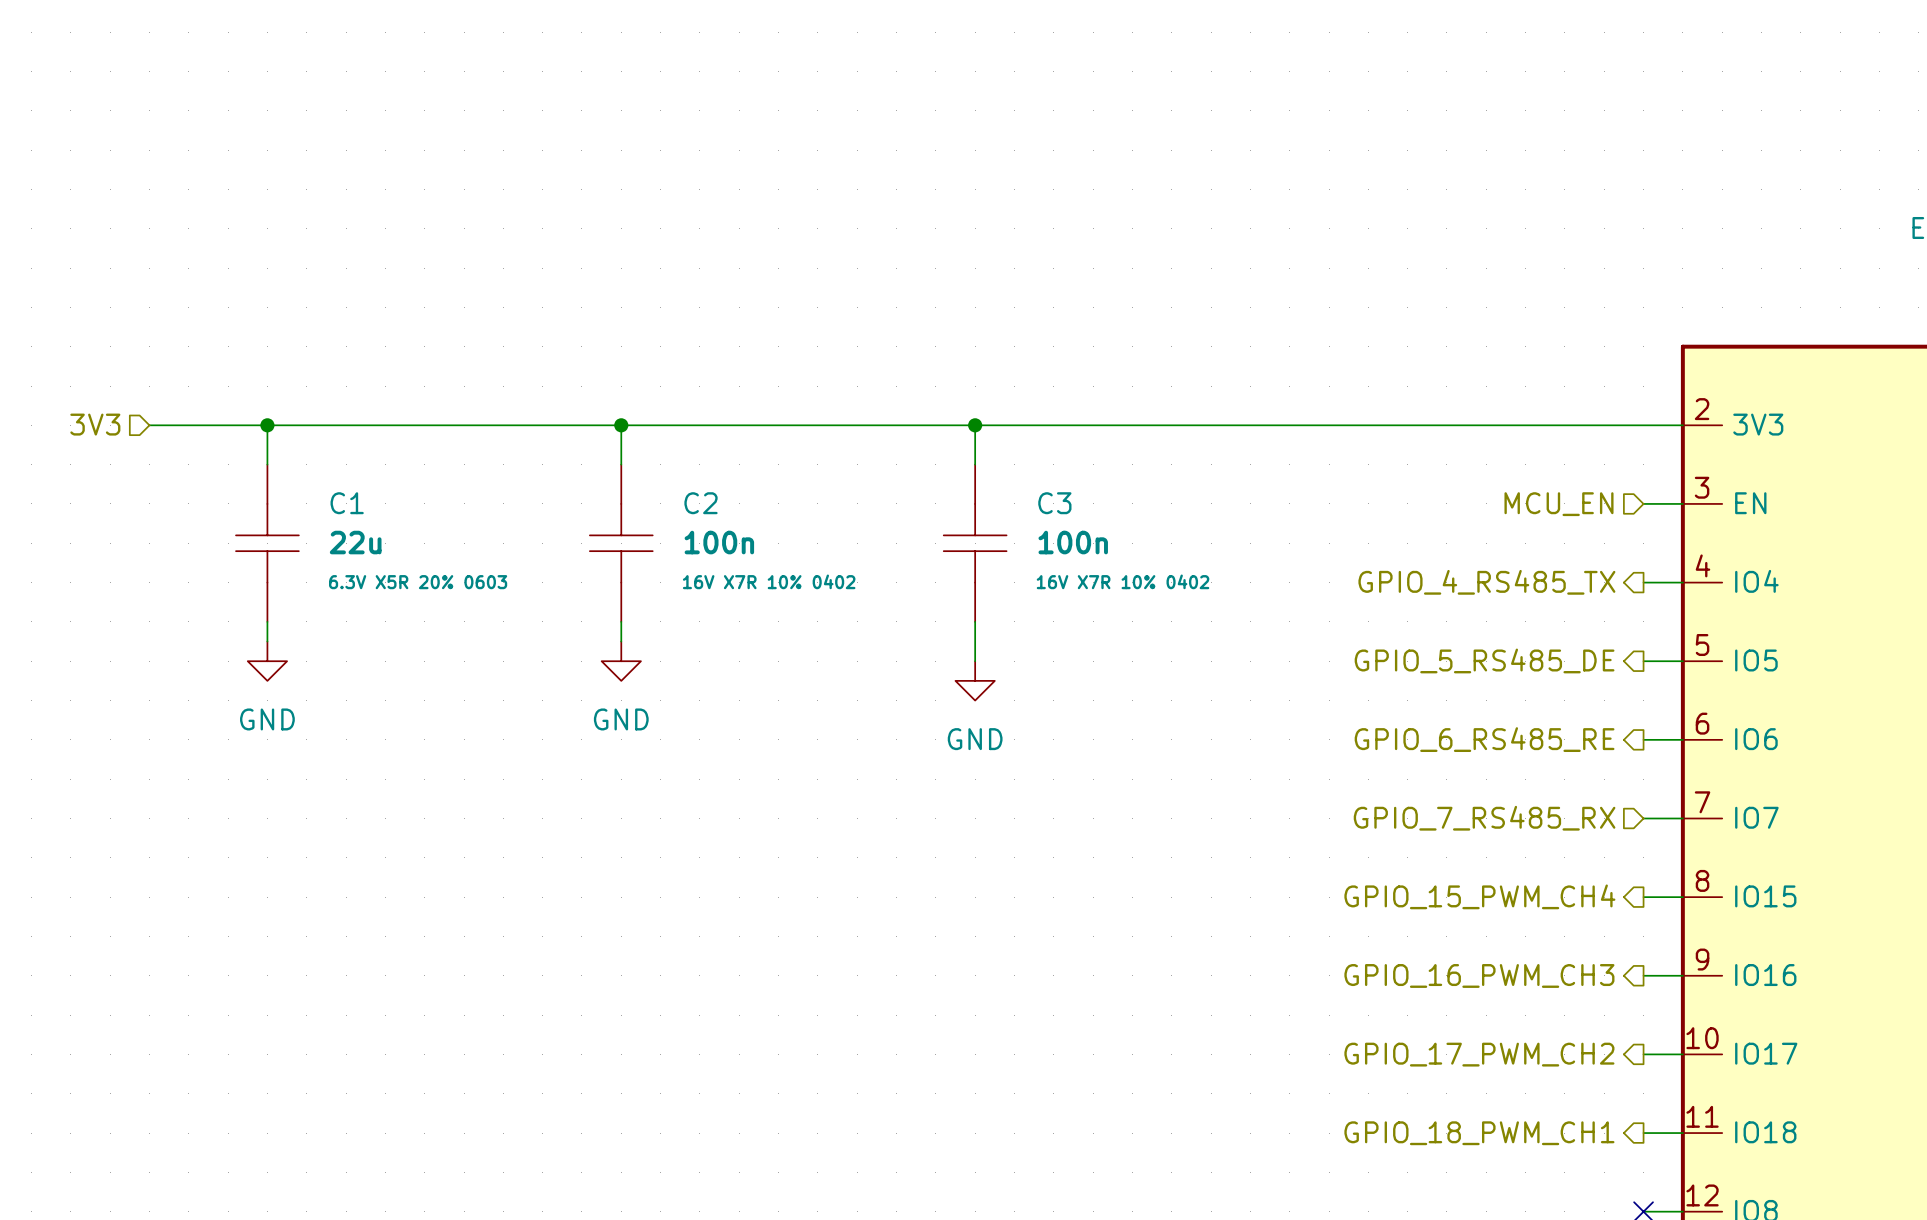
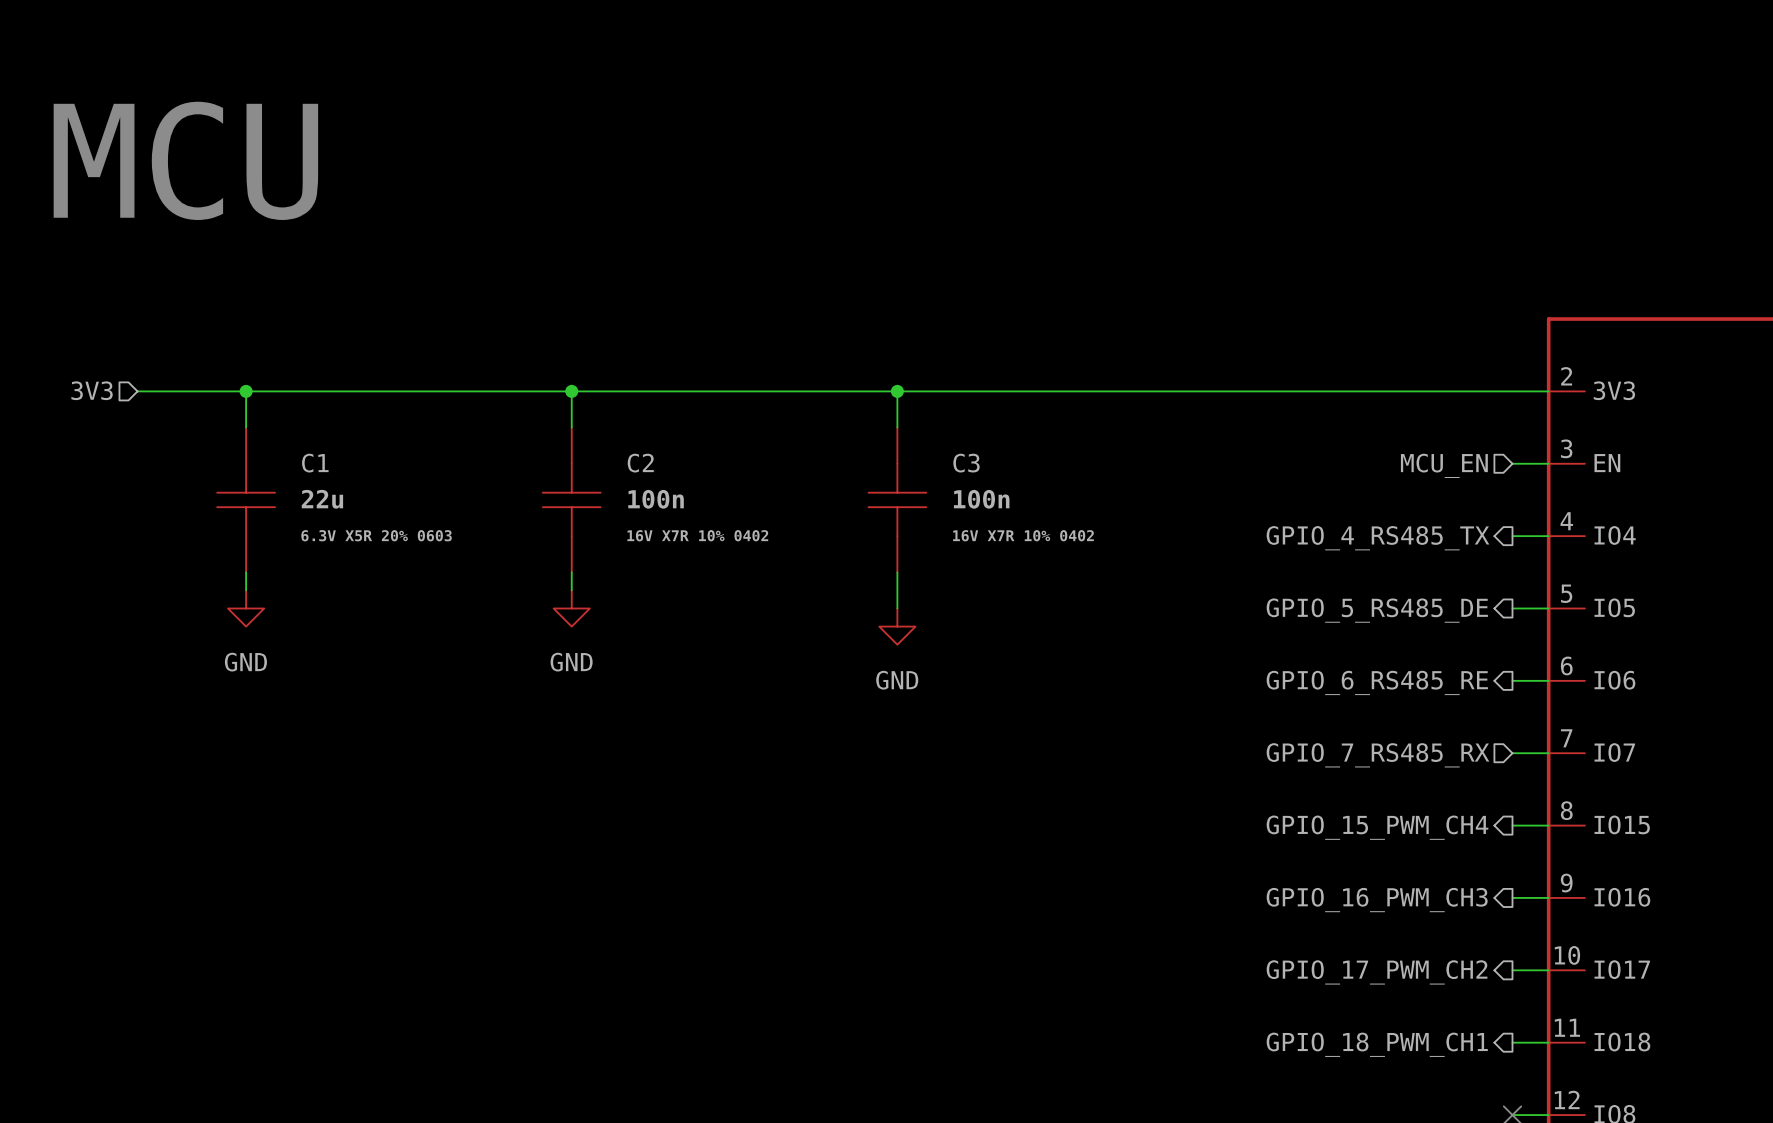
text: none -> MCU (185, 160)

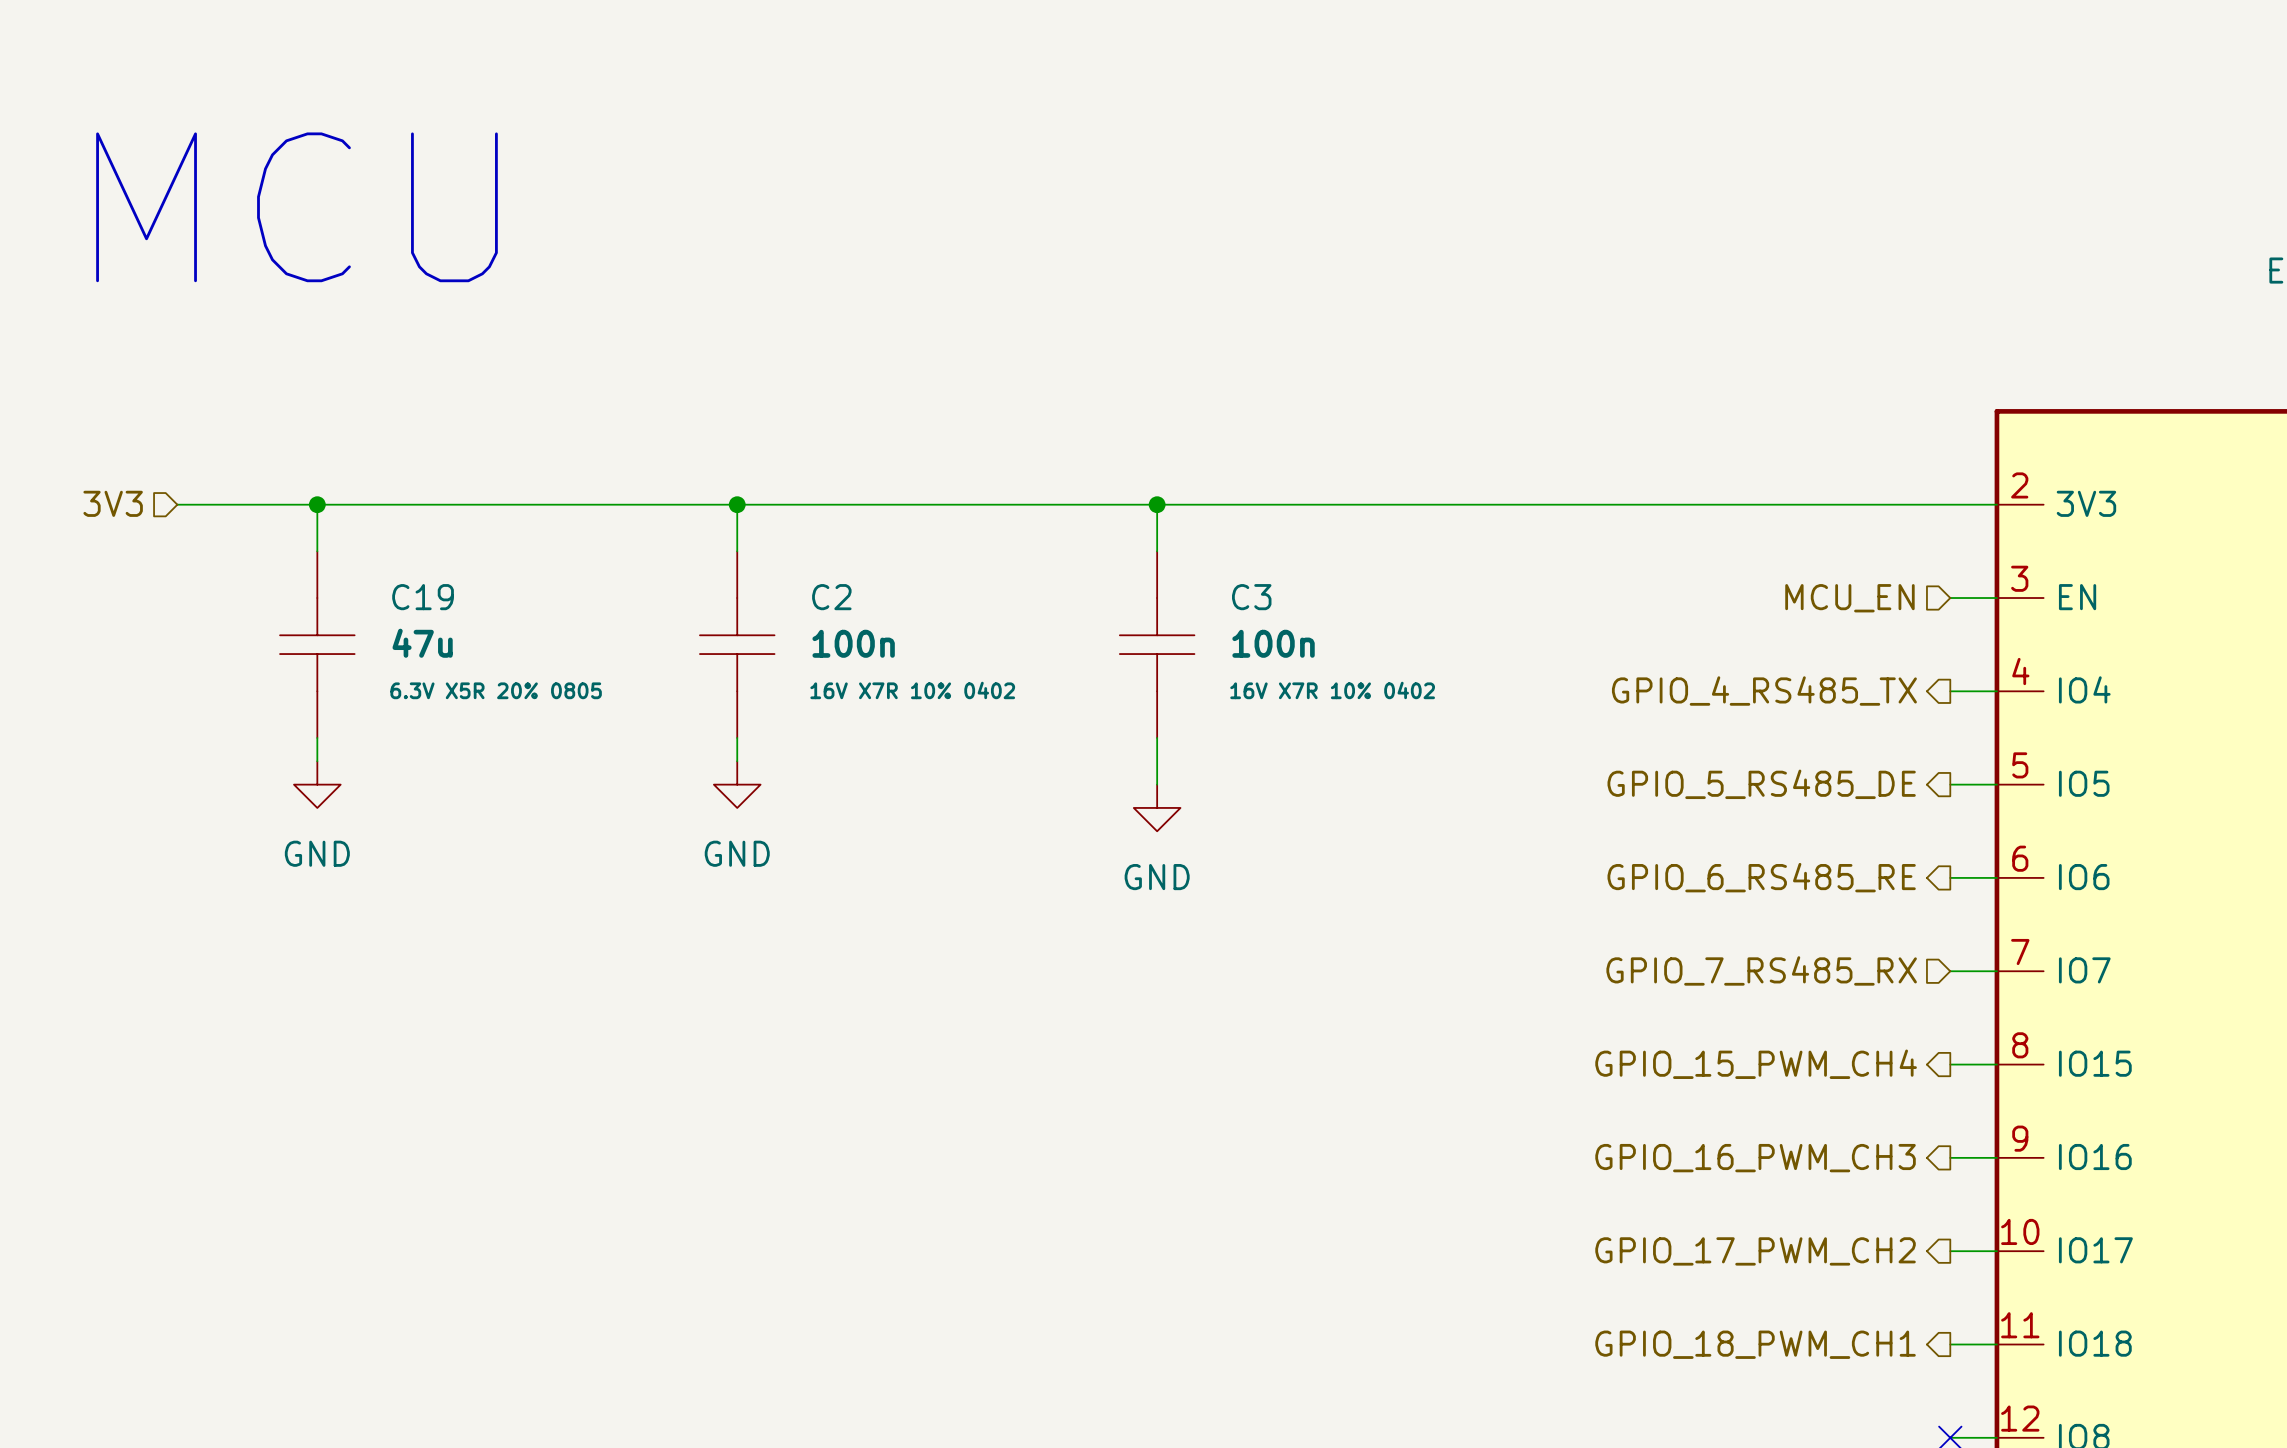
C1 name: C1 (315, 463) -> C19 (423, 597)
C1 value: 22u (322, 499) -> 47u (422, 643)
C1 text: 6.3V X5R 20% 0603 (376, 535) -> 6.3V X5R 20% 0805 (496, 690)

